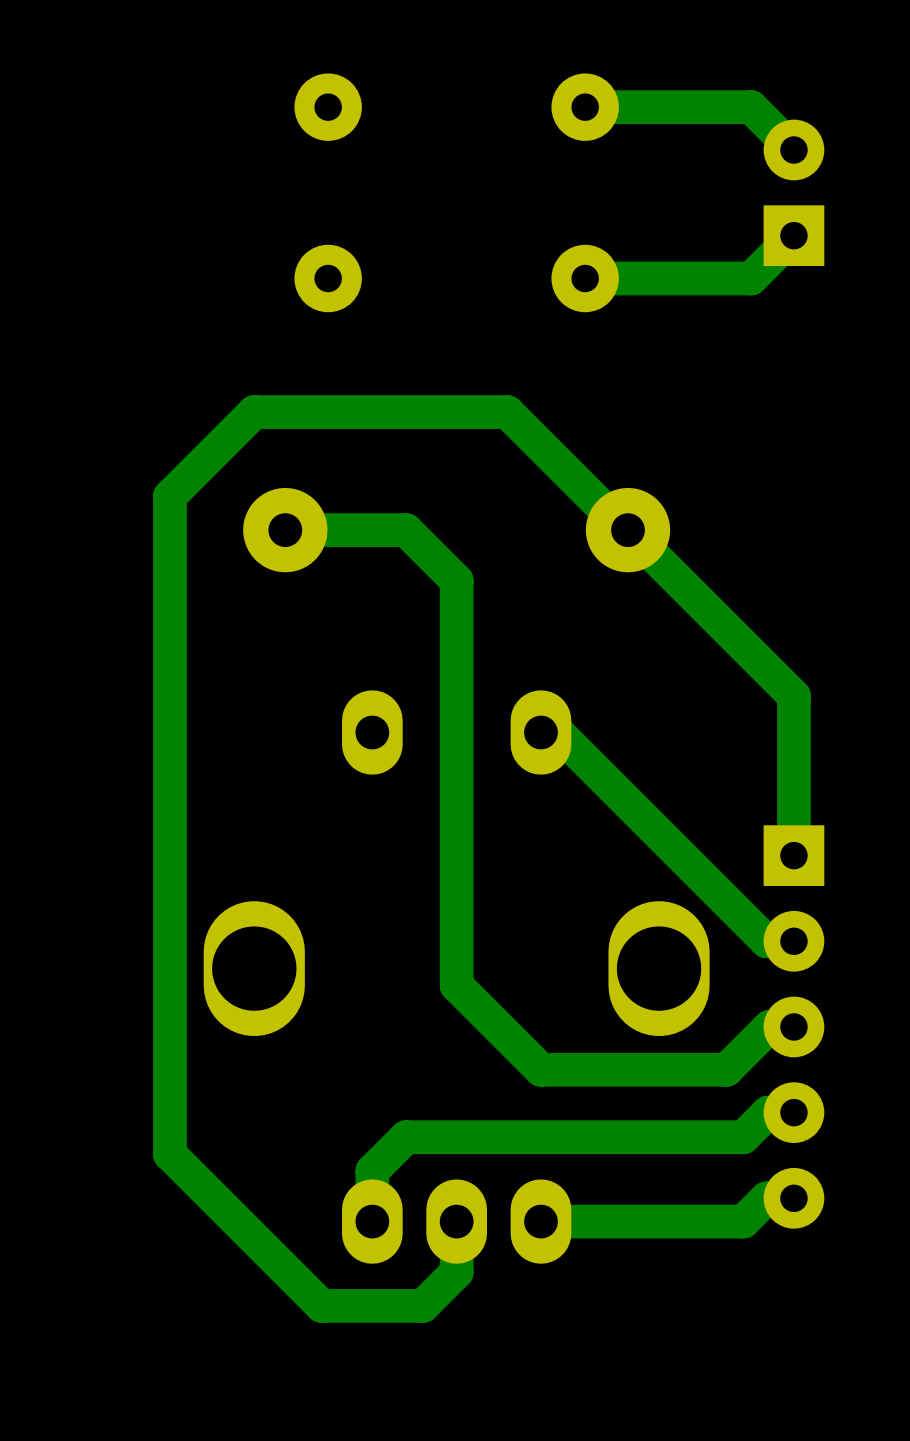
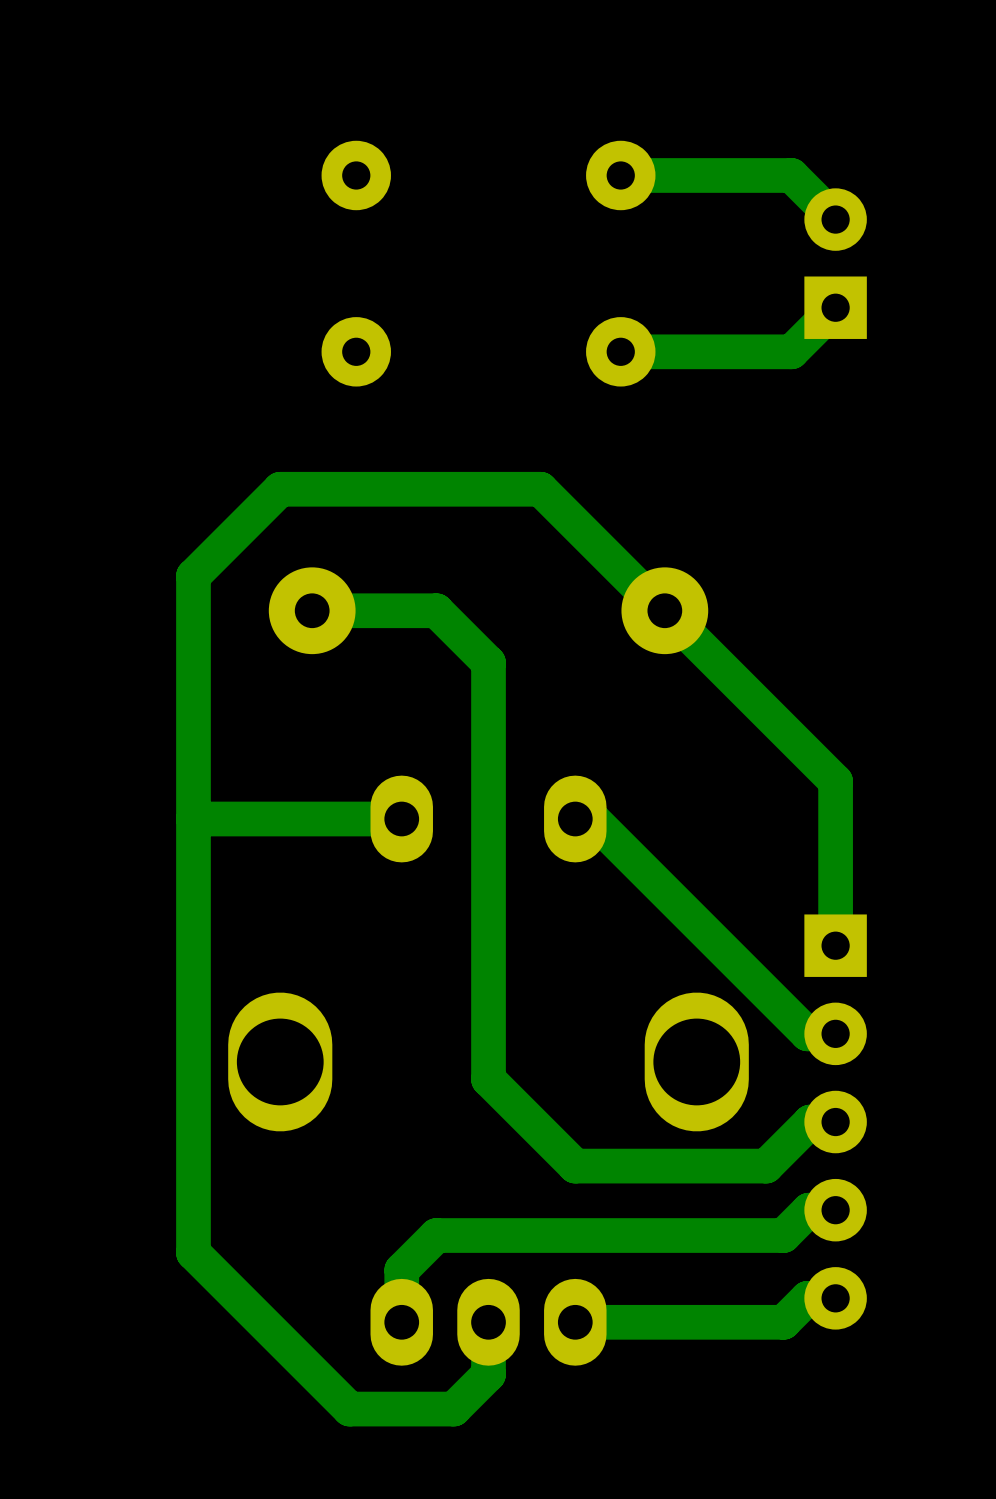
track: none -> (401, 819) (193, 819)

